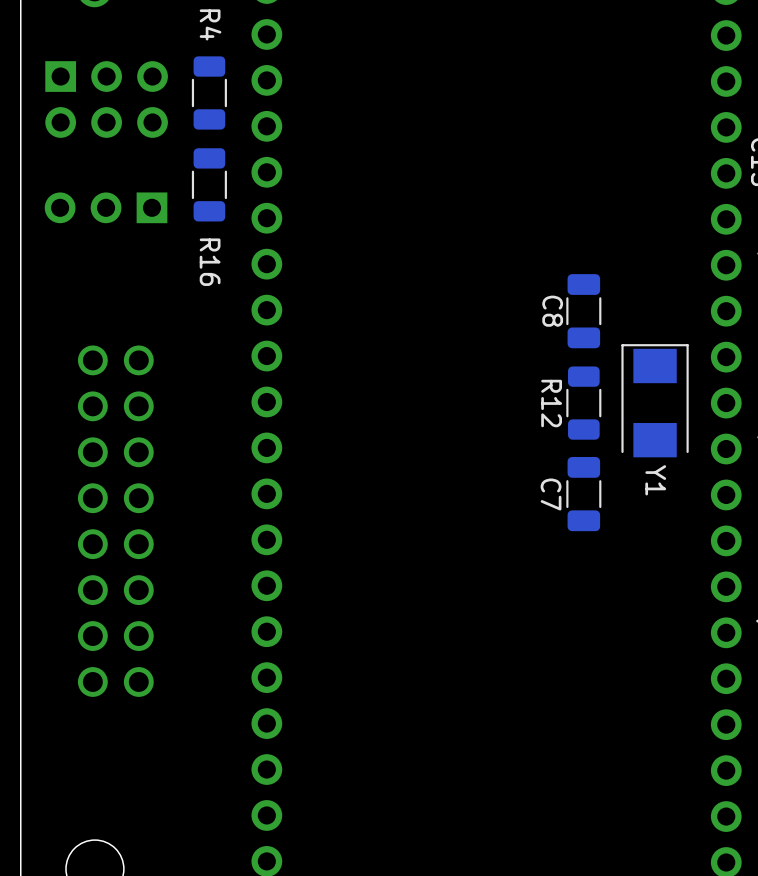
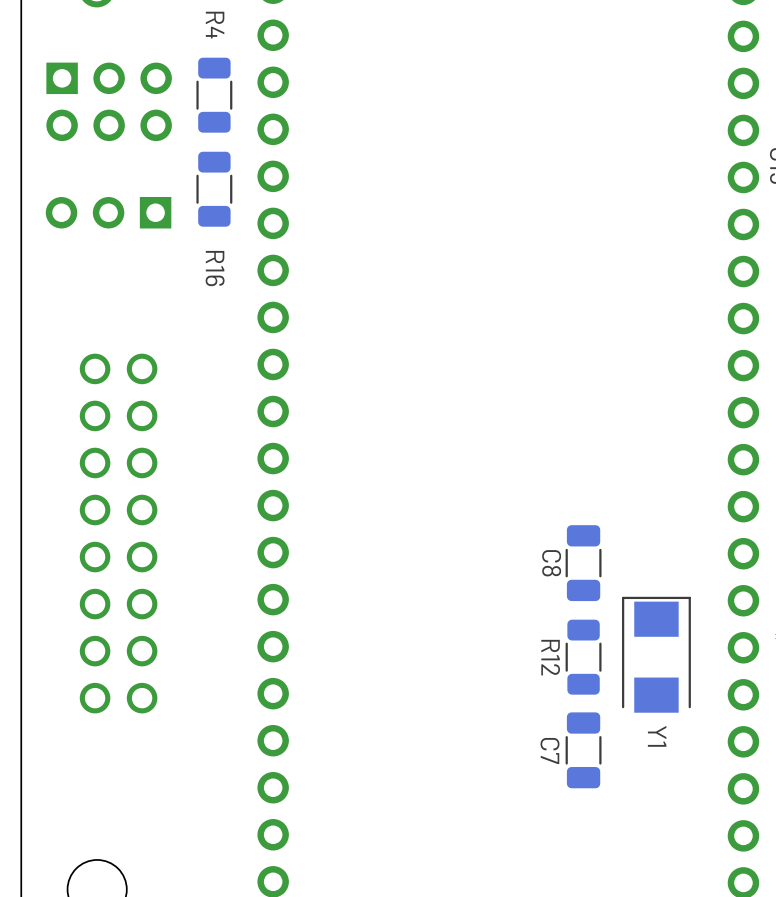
C8 position: (583, 311) -> (583, 563)
Y1 position: (655, 400) -> (656, 654)
R12 position: (583, 403) -> (583, 657)
C7 position: (583, 494) -> (583, 750)

